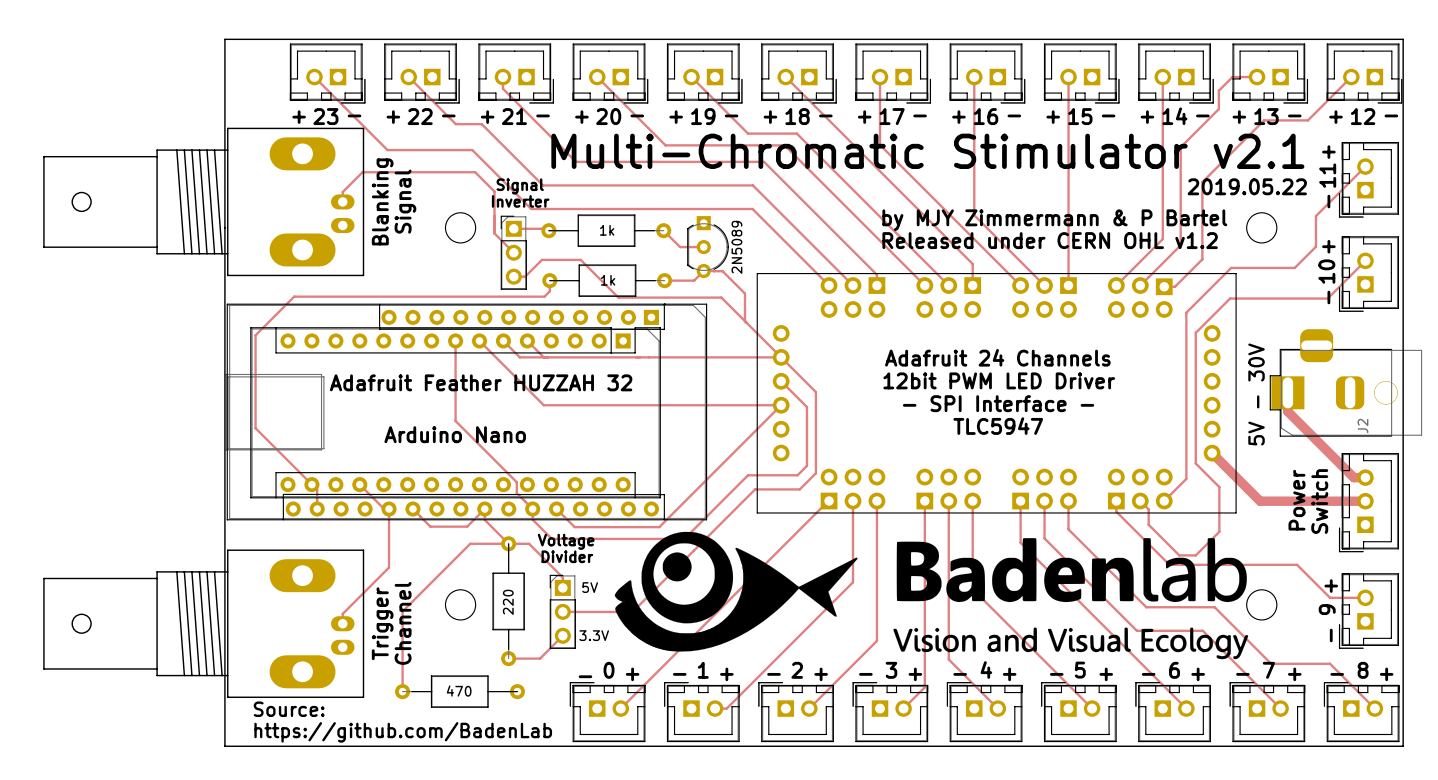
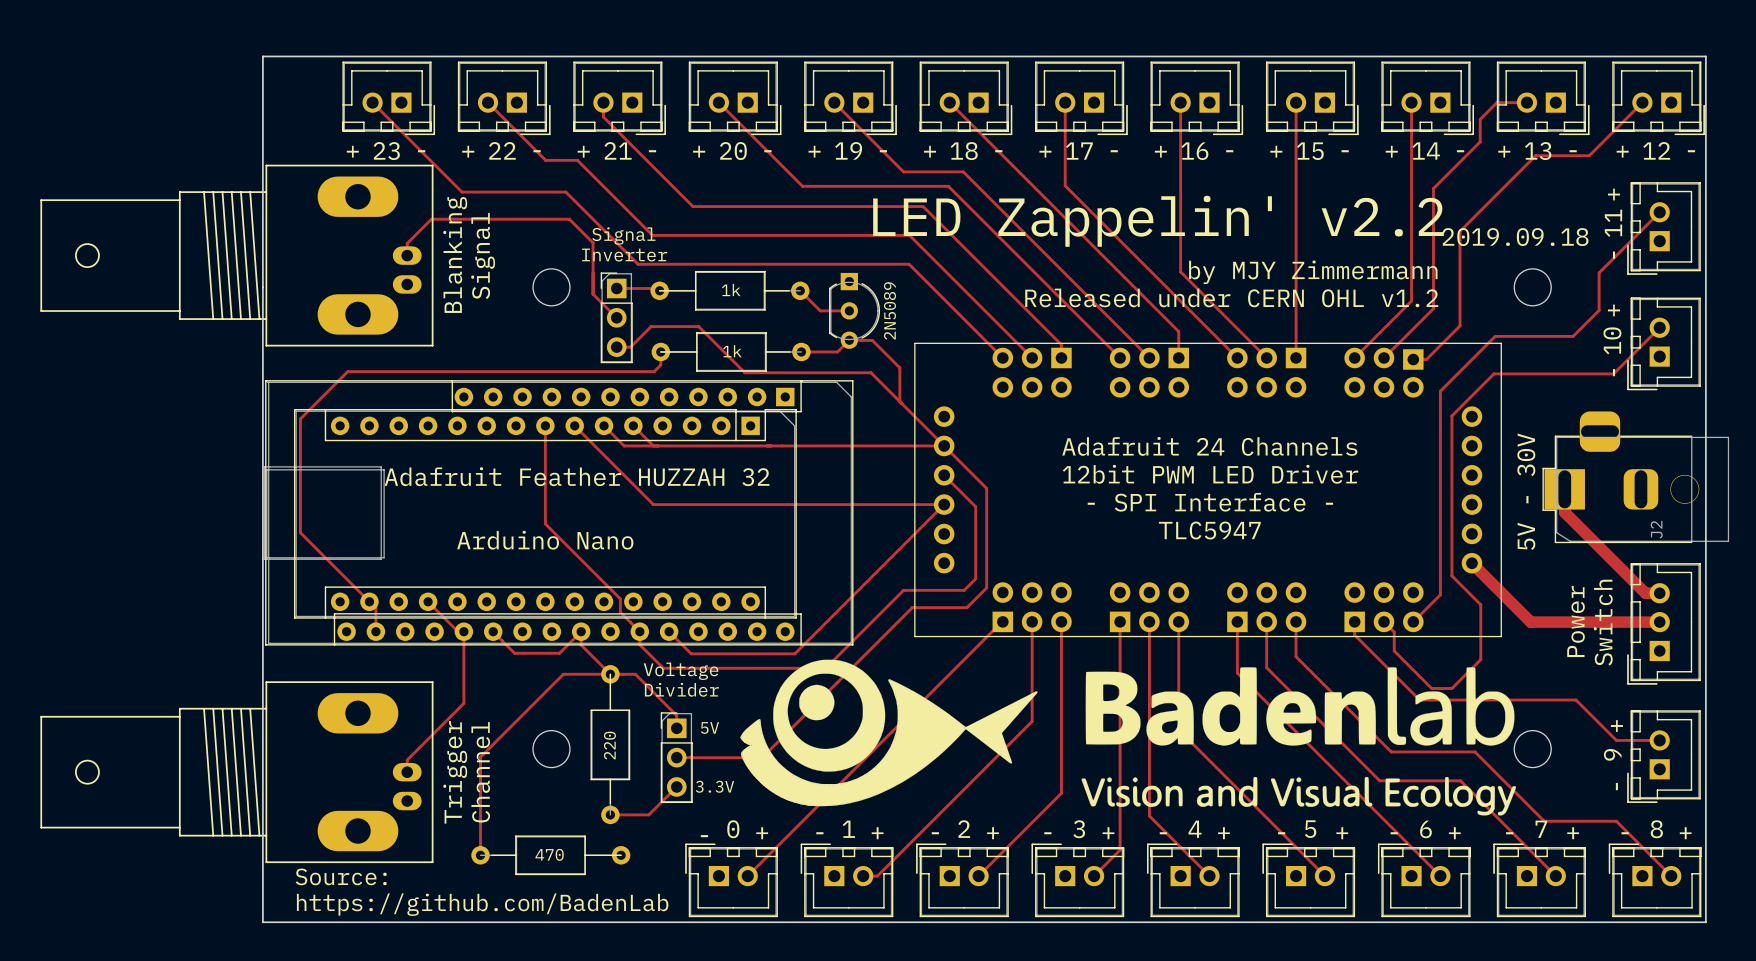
text: Multi-Chromatic Stimulator v2.1 (927, 151) -> none
text: none -> LED Zappelin' v2.2 (1158, 221)
text: 2019.05.22 (1247, 186) -> 2019.09.18 (1515, 237)
text: none -> by MJY Zimmermann (1313, 272)
text: by MJY Zimmermann & P Bartel (1054, 220) -> none
text: none -> Released under CERN OHL v1.2 (1231, 297)
text: Released under CERN OHL v1.2 (1050, 240) -> none

